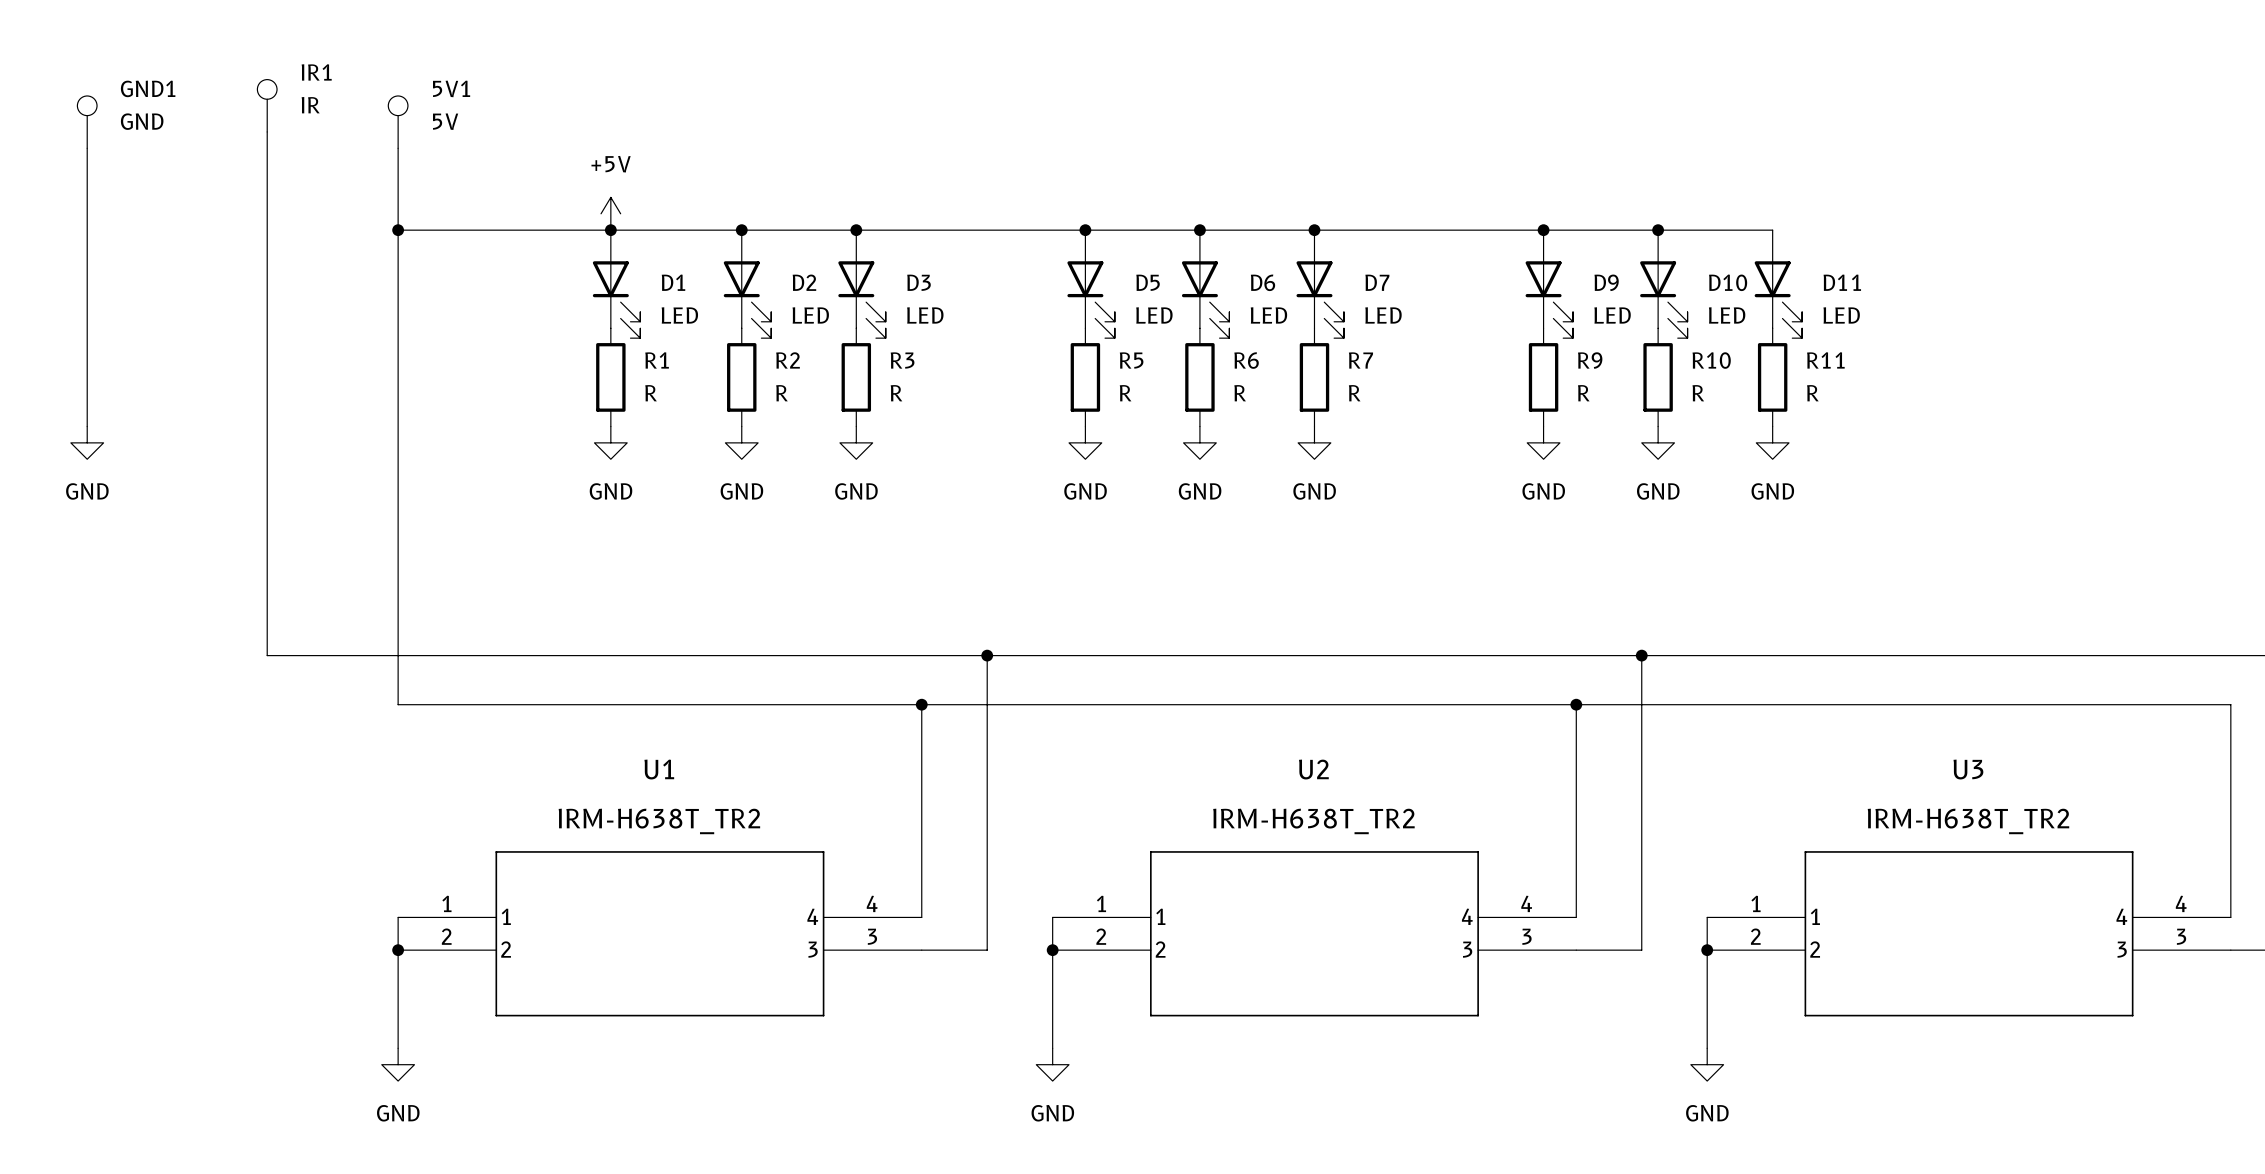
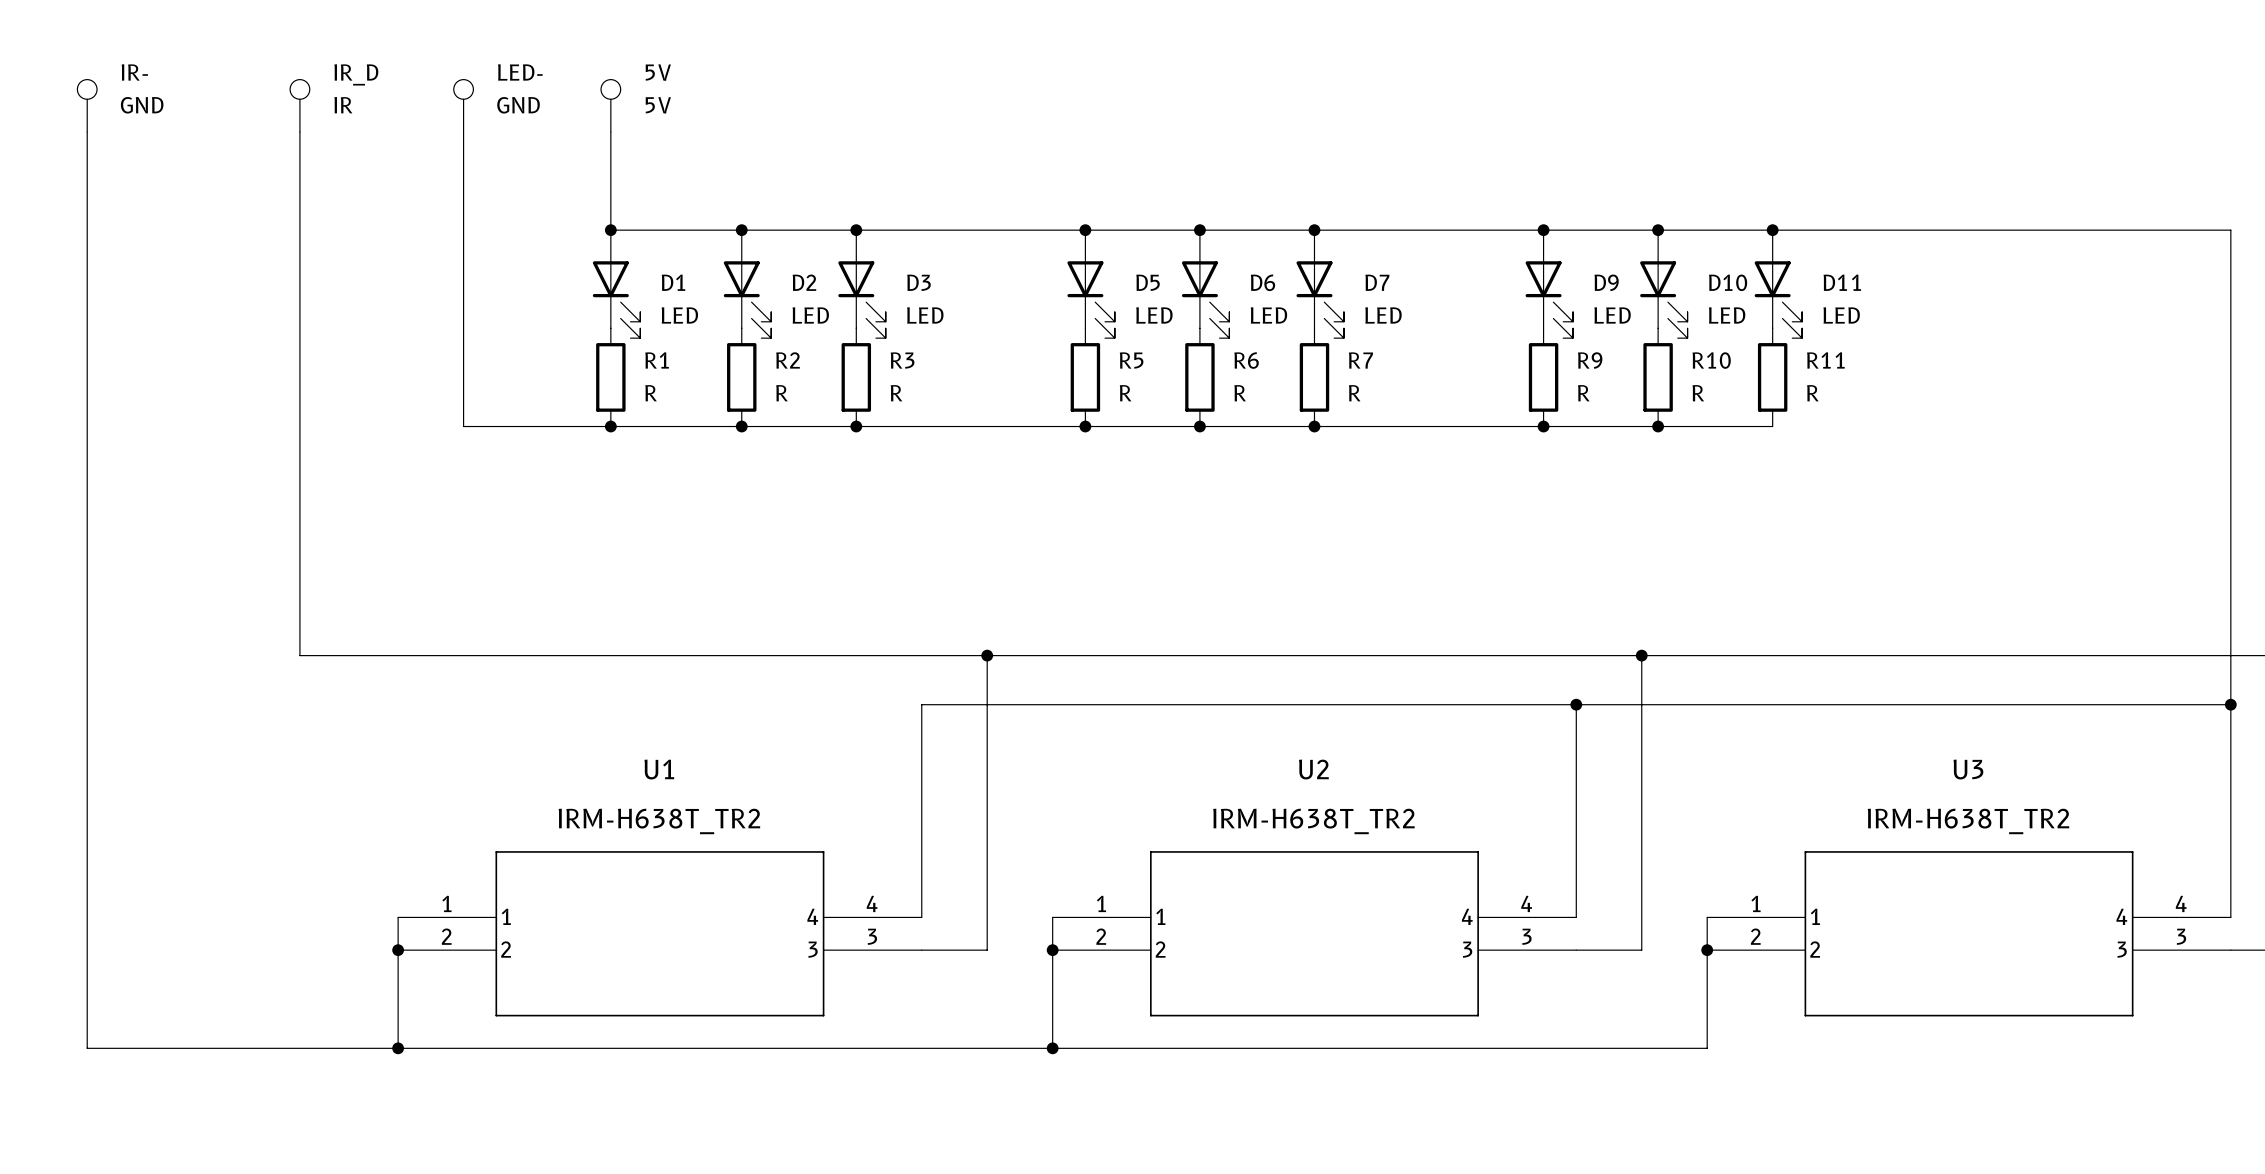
IR-: none -> GND (87, 105)
IR1: IR (267, 105) -> none
IR_D: none -> IR (299, 105)
LED-: none -> GND (463, 105)
5V: none -> 5V (610, 105)
GND1: GND (87, 122) -> none
5V1: 5V (398, 122) -> none
wire: (267, 131) (267, 655) (299, 655) -> (299, 131) (299, 655)
wire: none -> (463, 131) (463, 426) (1772, 426)
wire: (398, 148) (398, 704) (921, 704) -> none
power symbol: +5V (610, 213) -> none
wire: (398, 230) (610, 230) -> (610, 131) (610, 230)
junction: (398, 230) -> none
wire: none -> (1772, 230) (2230, 230) (2230, 704)
junction: none -> (1772, 230)
wire: none -> (87, 426) (87, 1048) (1707, 1048)
junction: none -> (610, 426)
junction: none -> (741, 426)
junction: none -> (856, 426)
junction: none -> (1085, 426)
junction: none -> (1199, 426)
junction: none -> (1314, 426)
junction: none -> (1543, 426)
junction: none -> (1658, 426)
power symbol: GND (87, 442) -> none
power symbol: GND (610, 442) -> none
power symbol: GND (741, 442) -> none
power symbol: GND (856, 442) -> none
power symbol: GND (1085, 442) -> none
power symbol: GND (1199, 442) -> none
power symbol: GND (1314, 442) -> none
power symbol: GND (1543, 442) -> none
power symbol: GND (1658, 442) -> none
power symbol: GND (1772, 442) -> none
junction: (921, 704) -> none
junction: none -> (2230, 704)
junction: none -> (398, 1048)
junction: none -> (1052, 1048)
power symbol: GND (398, 1064) -> none
power symbol: GND (1052, 1064) -> none
power symbol: GND (1707, 1064) -> none

